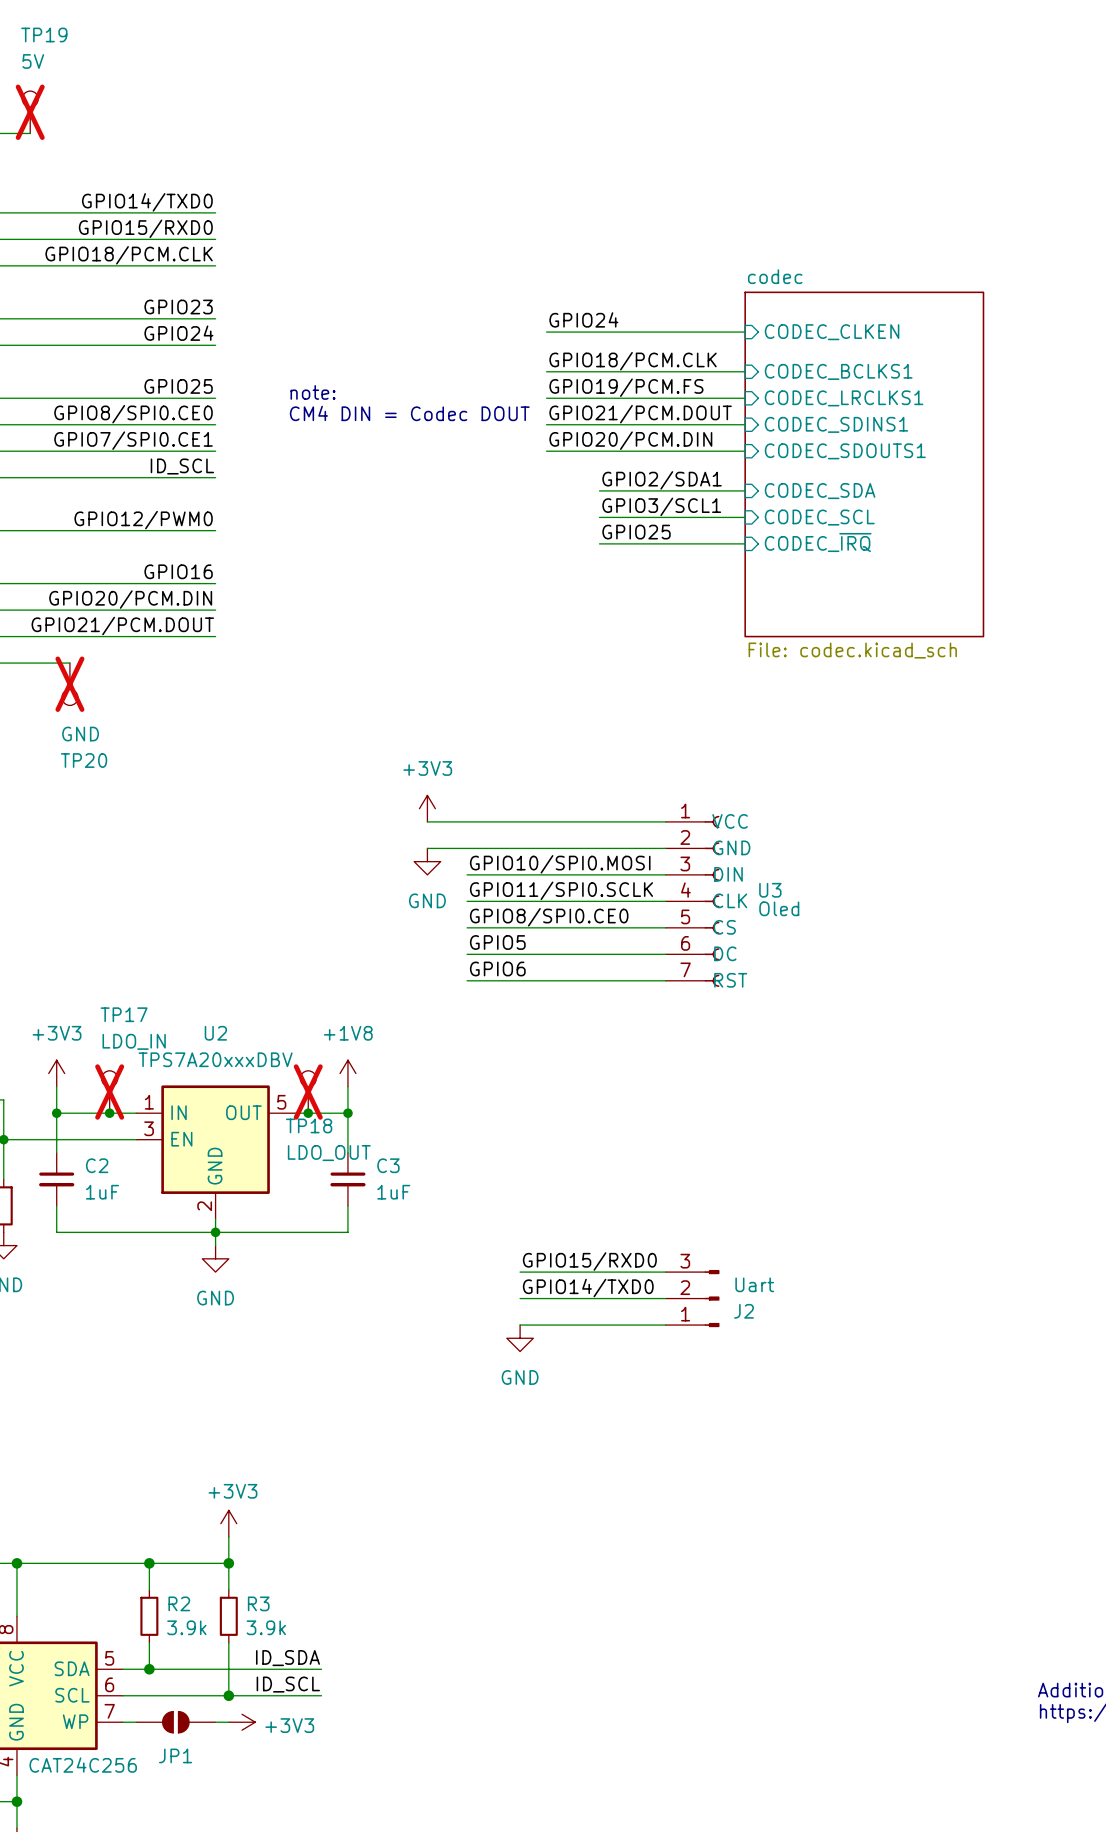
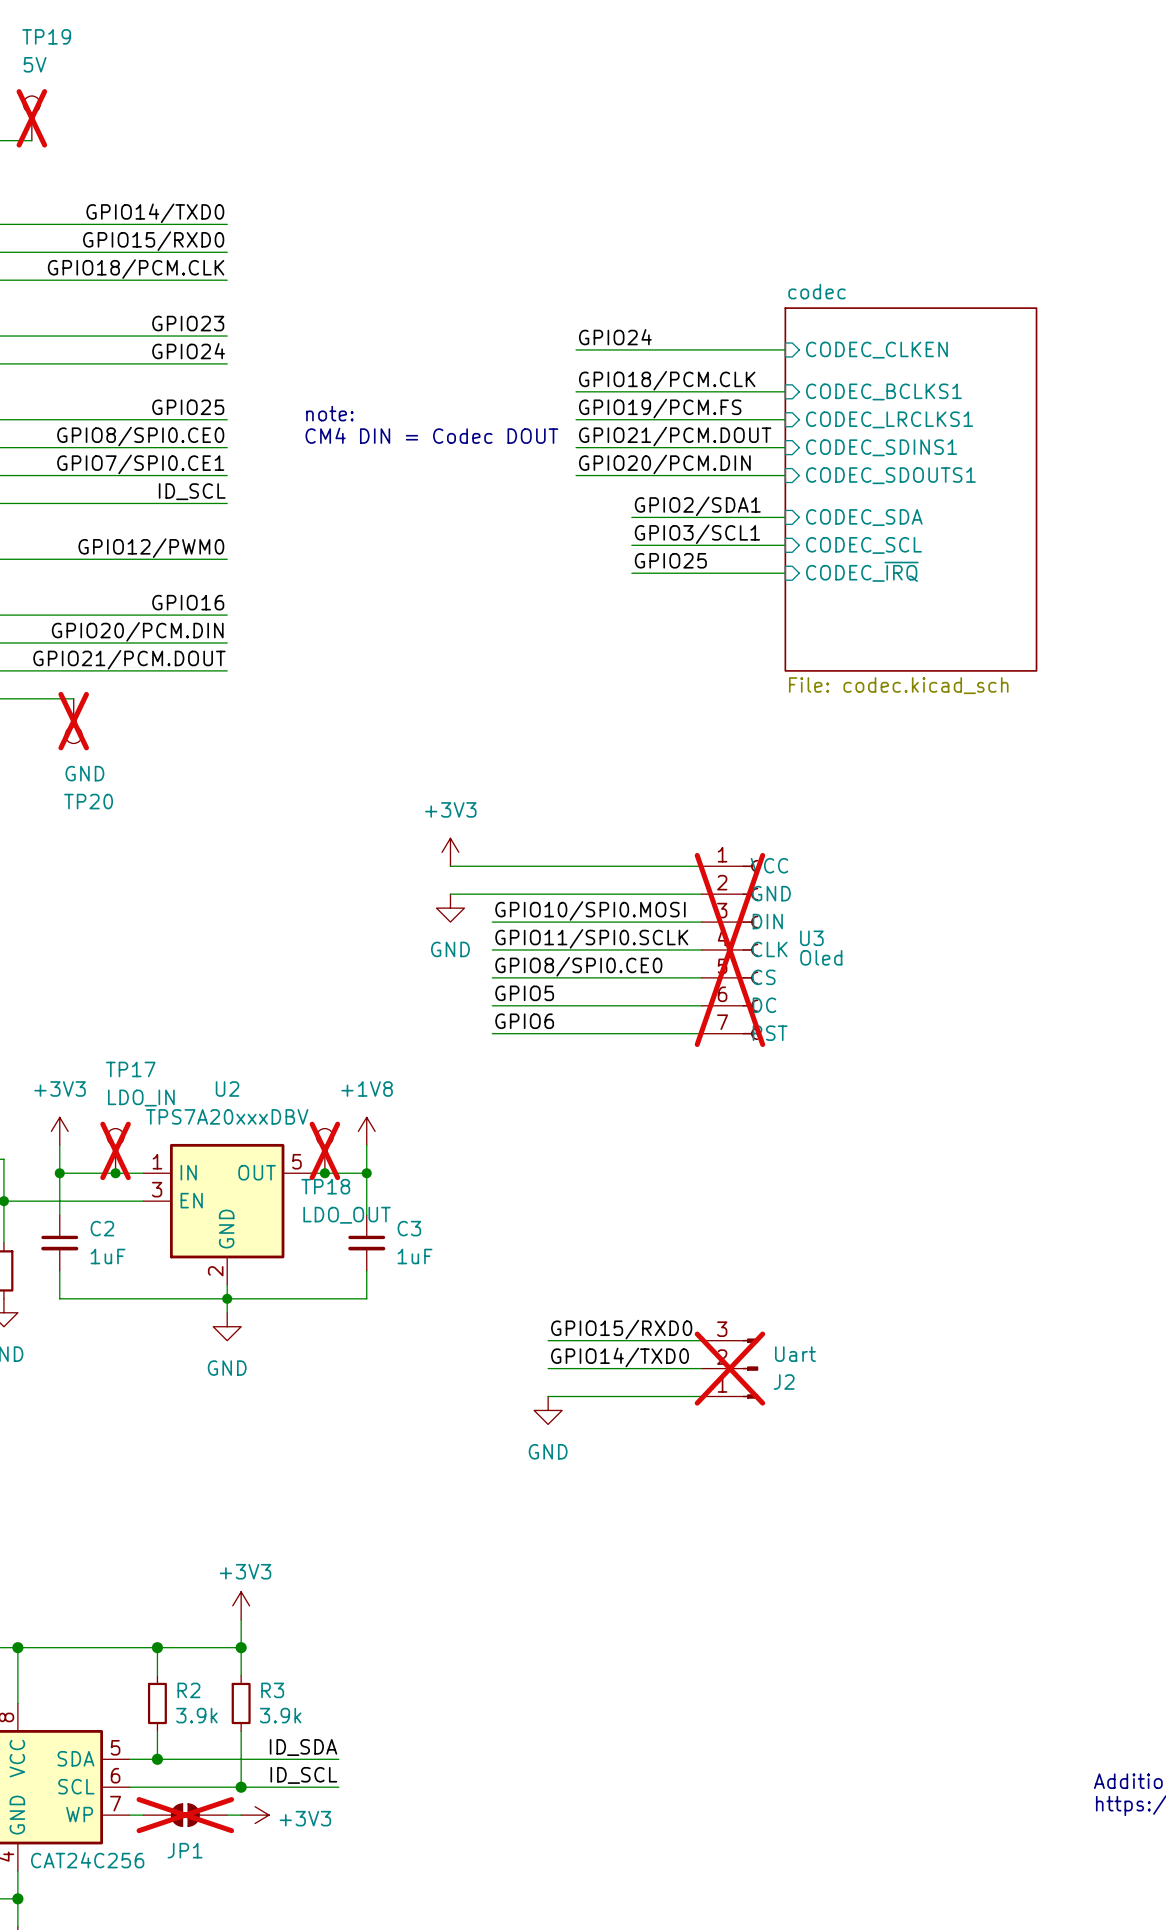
U3 do-not-place cross: none -> (729, 949)
J2 do-not-place cross: none -> (729, 1368)
JP1 do-not-place cross: none -> (185, 1815)

